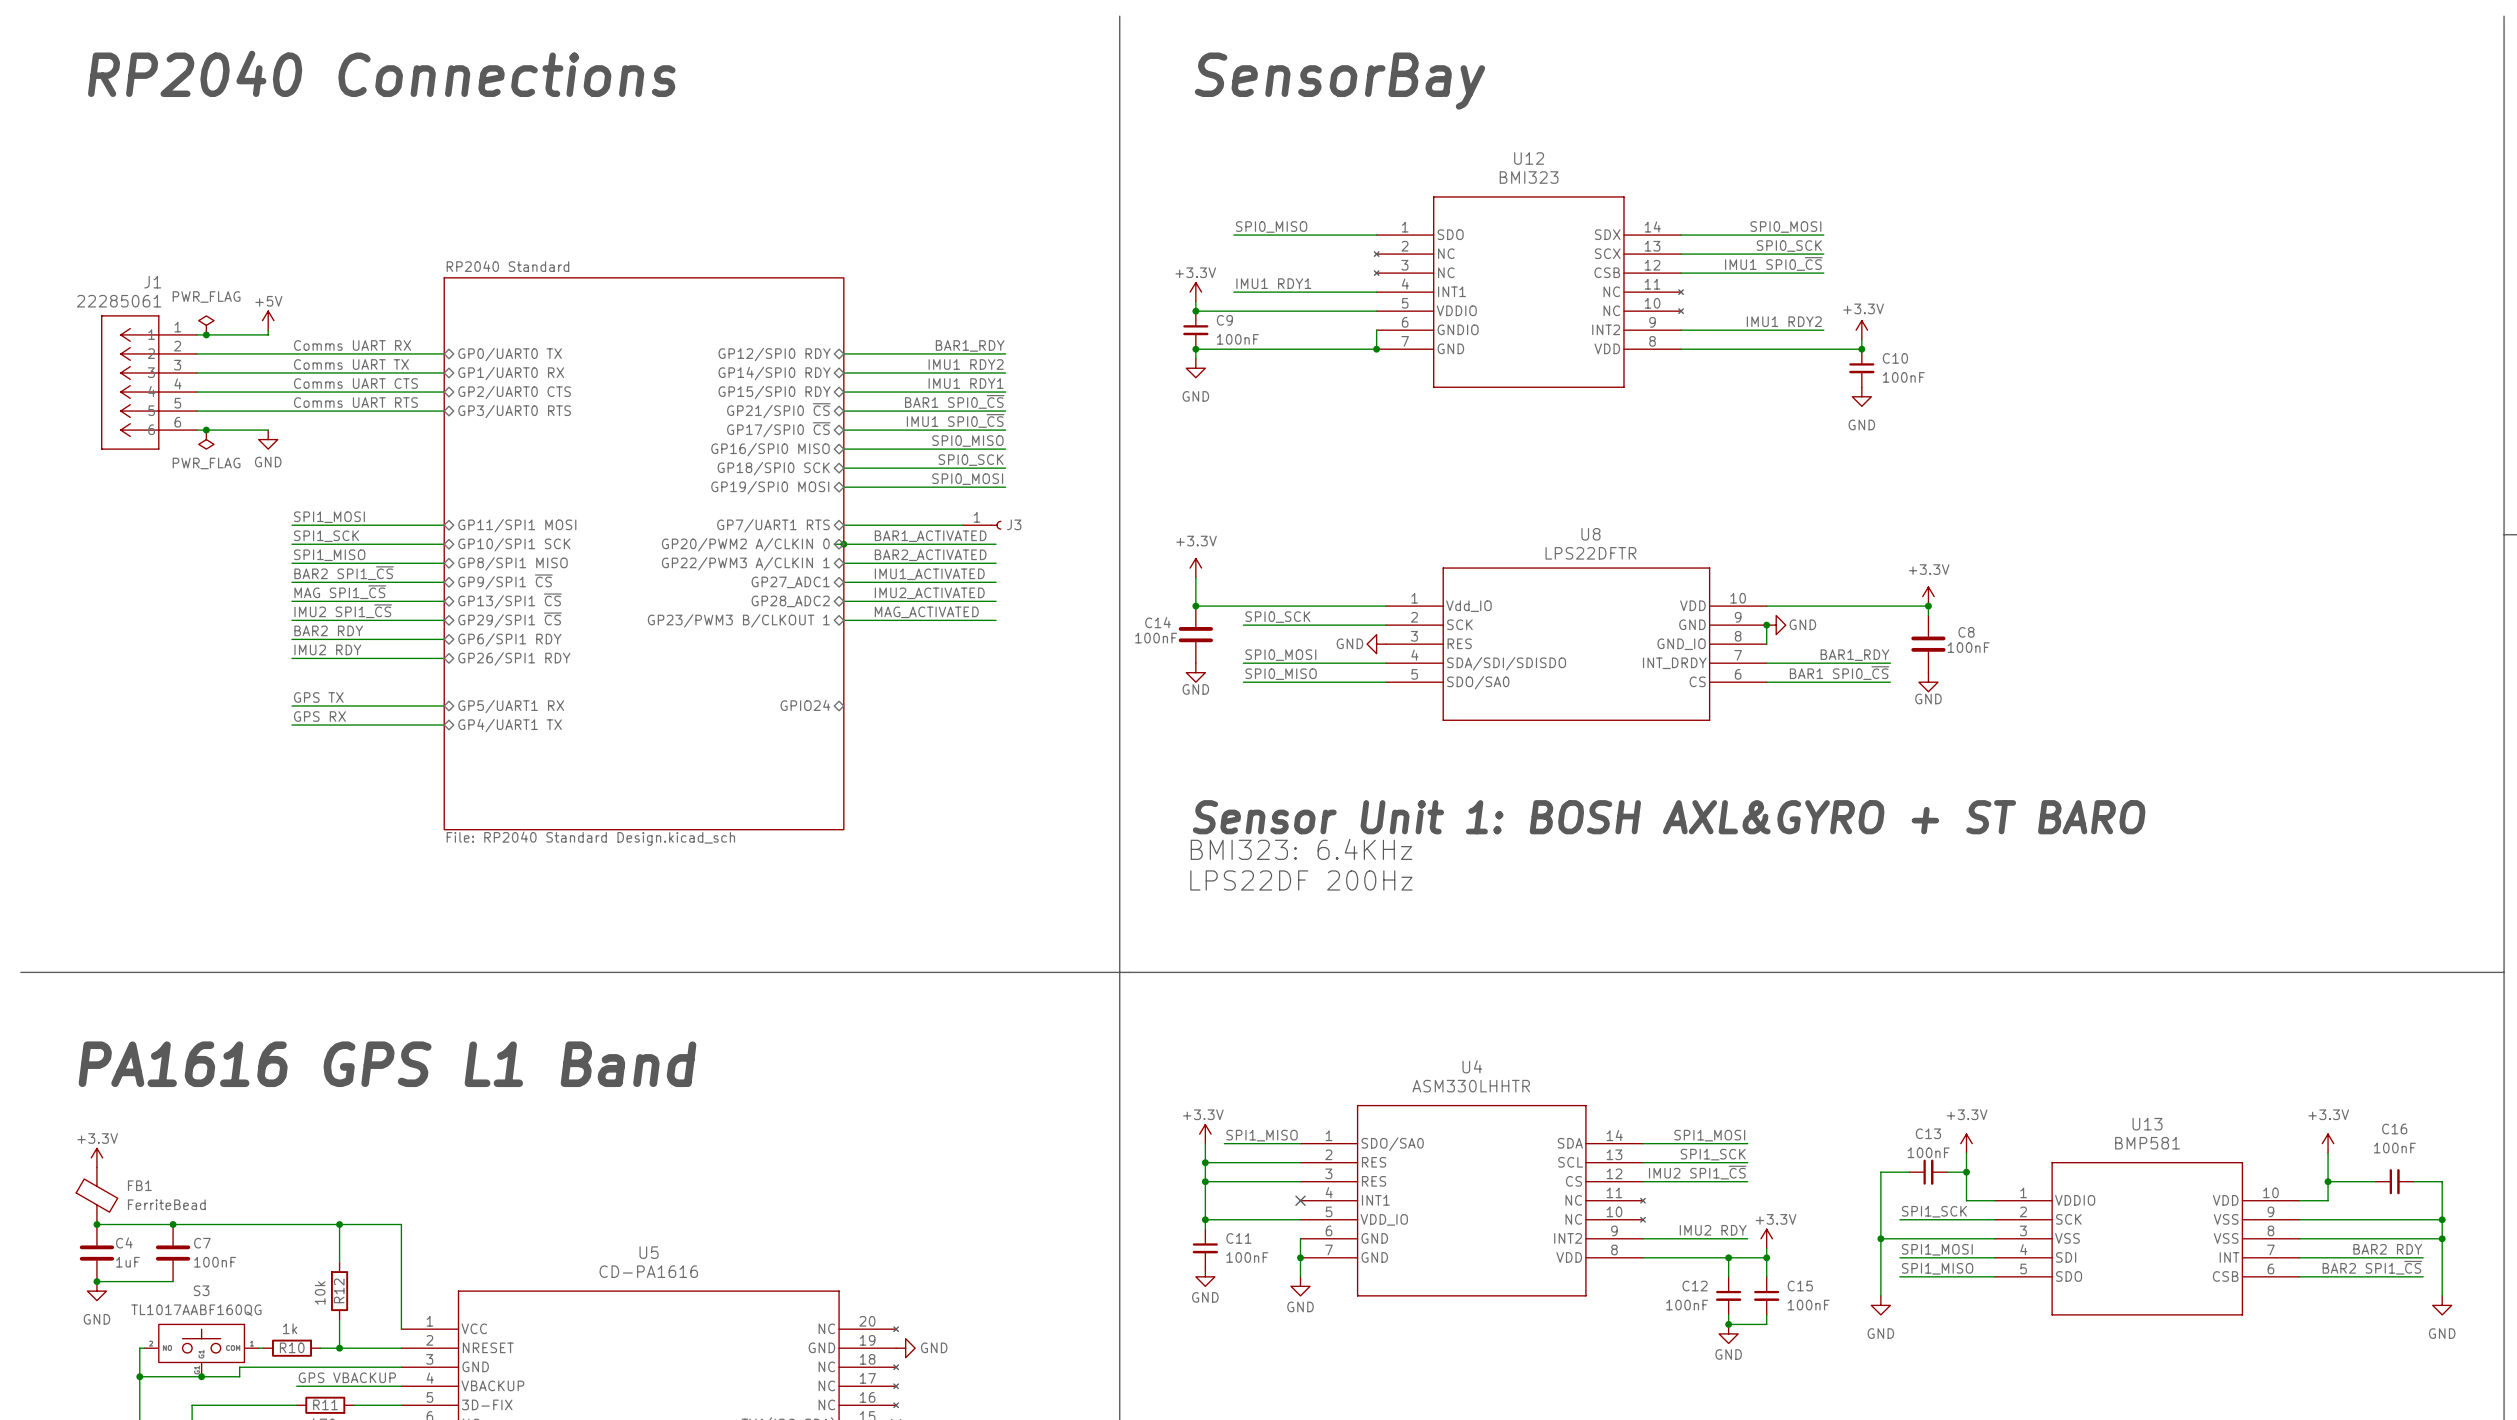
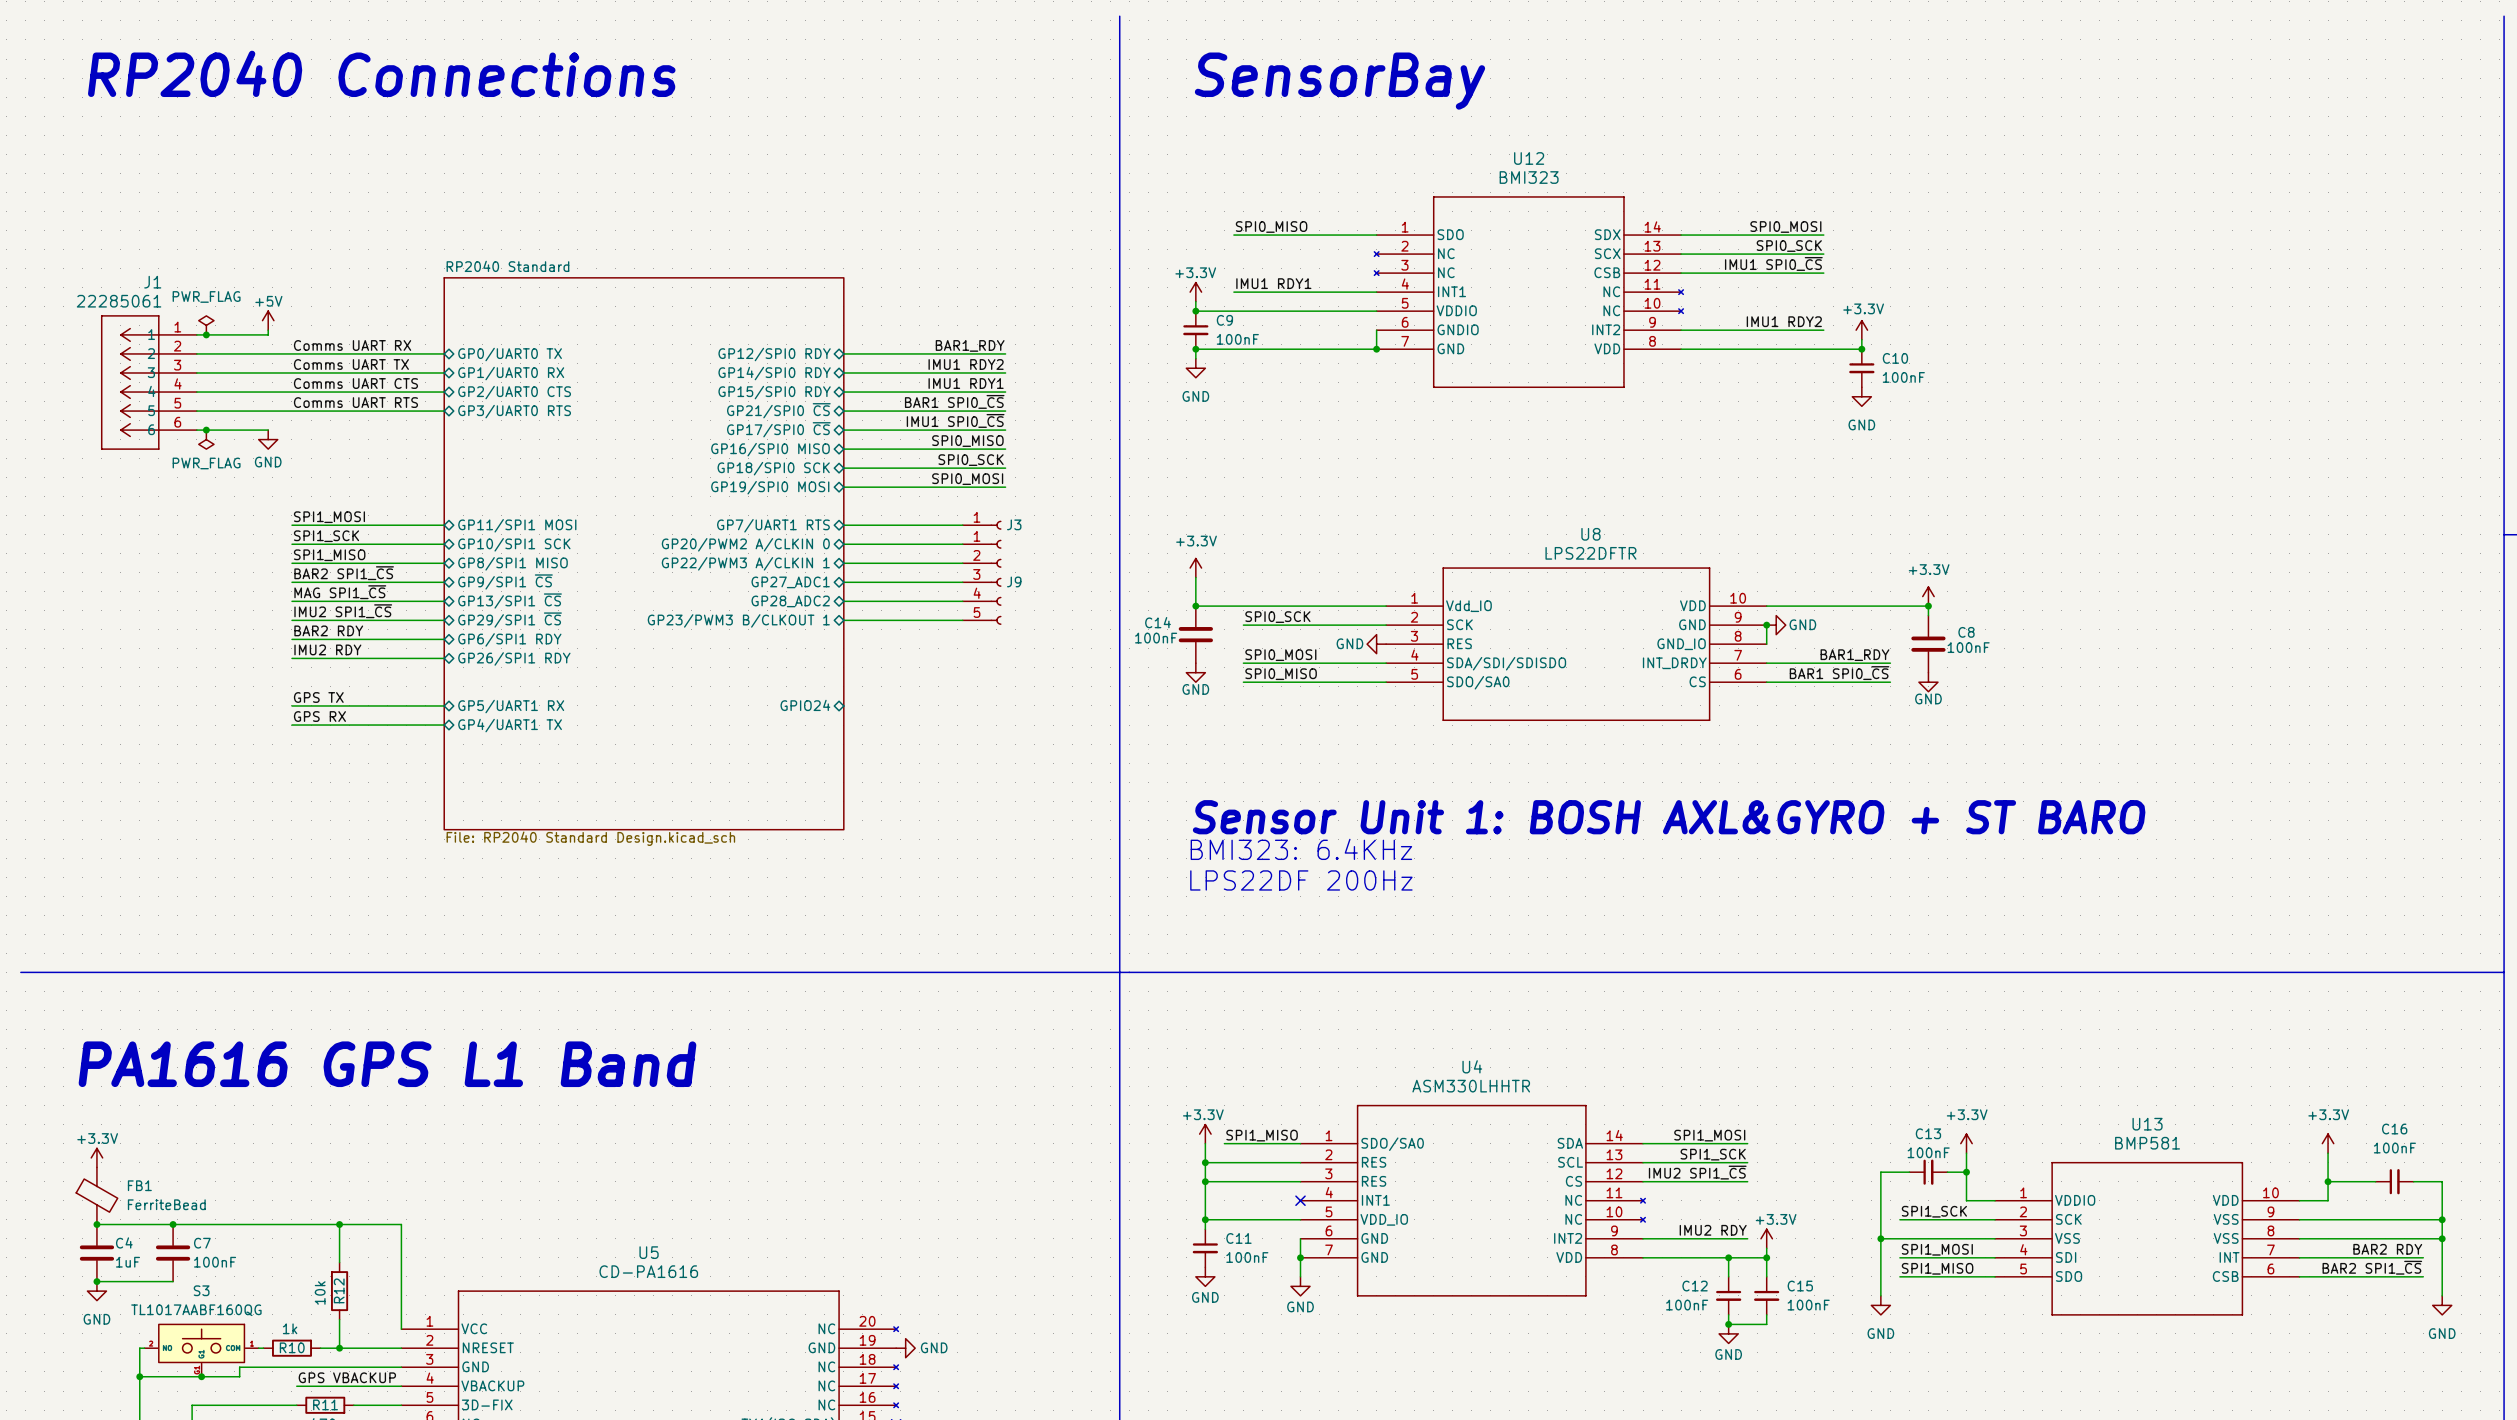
label: BAR1_ACTIVATED (930, 536) -> none
wire: (834, 544) (843, 544) -> none
junction: (843, 544) -> none
label: BAR2_ACTIVATED (930, 555) -> none
label: IMU1_ACTIVATED (929, 574) -> none
J9: none -> (982, 582)
label: IMU2_ACTIVATED (929, 593) -> none
label: MAG_ACTIVATED (926, 612) -> none

